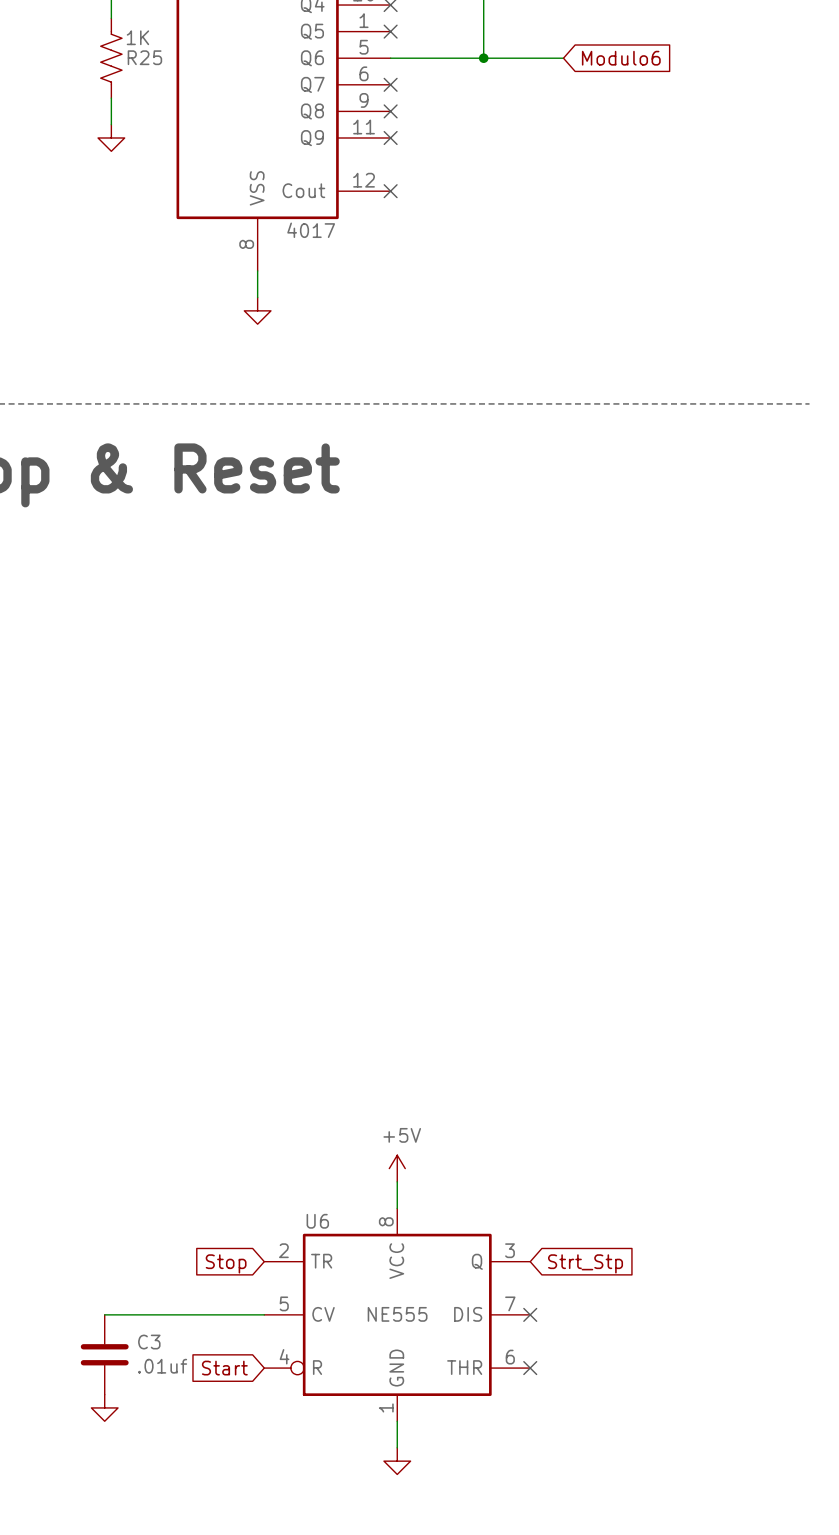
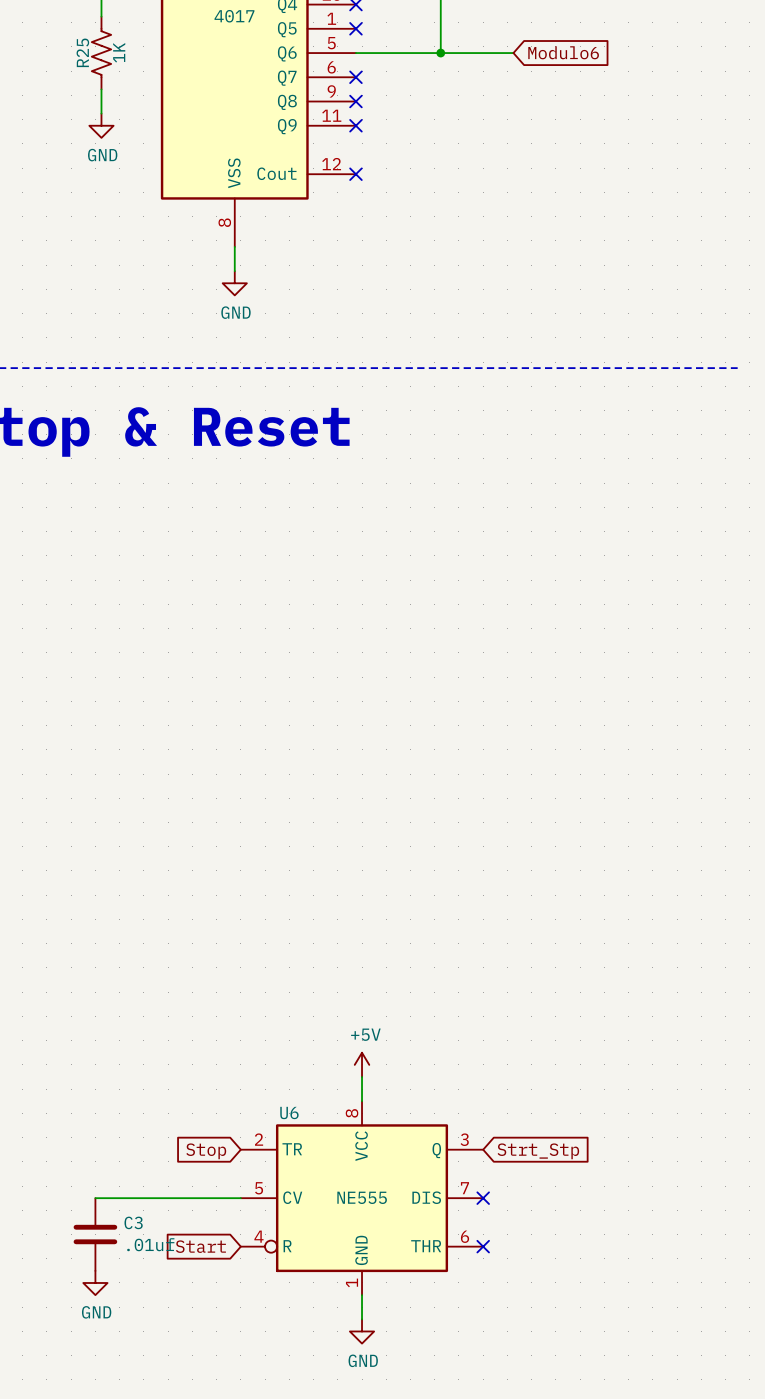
R25 value rotation: 0° (137, 37) -> 90° counterclockwise (119, 52)
R25 name rotation: 0° (144, 57) -> 90° counterclockwise (82, 52)
R25 name position: R25 (144, 57) -> R25 (82, 52)
power symbol text: none -> GND (102, 155)
part value position: 4017 (311, 230) -> 4017 (234, 16)
power symbol text: none -> GND (235, 312)
power symbol text: none -> GND (96, 1312)
power symbol text: none -> GND (363, 1360)

